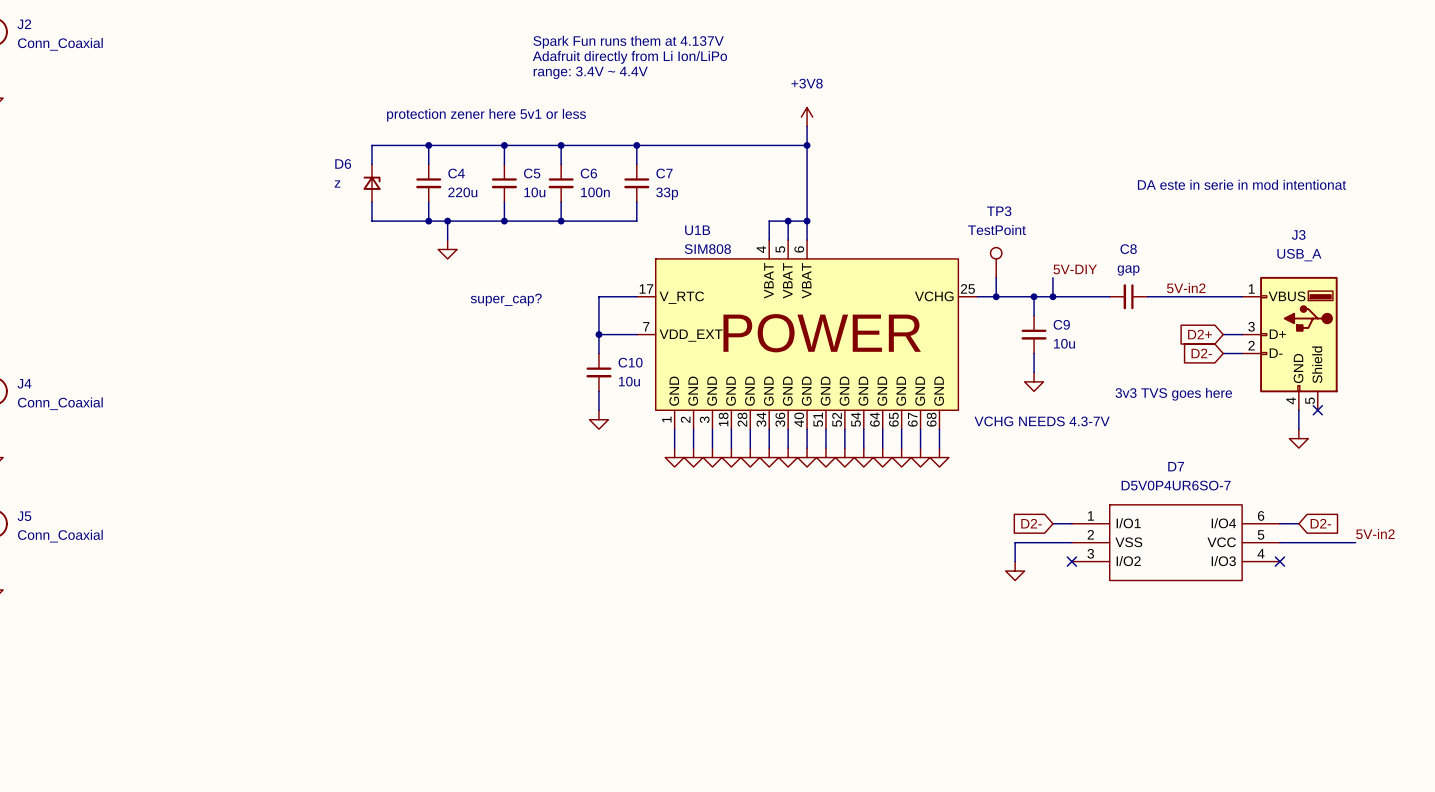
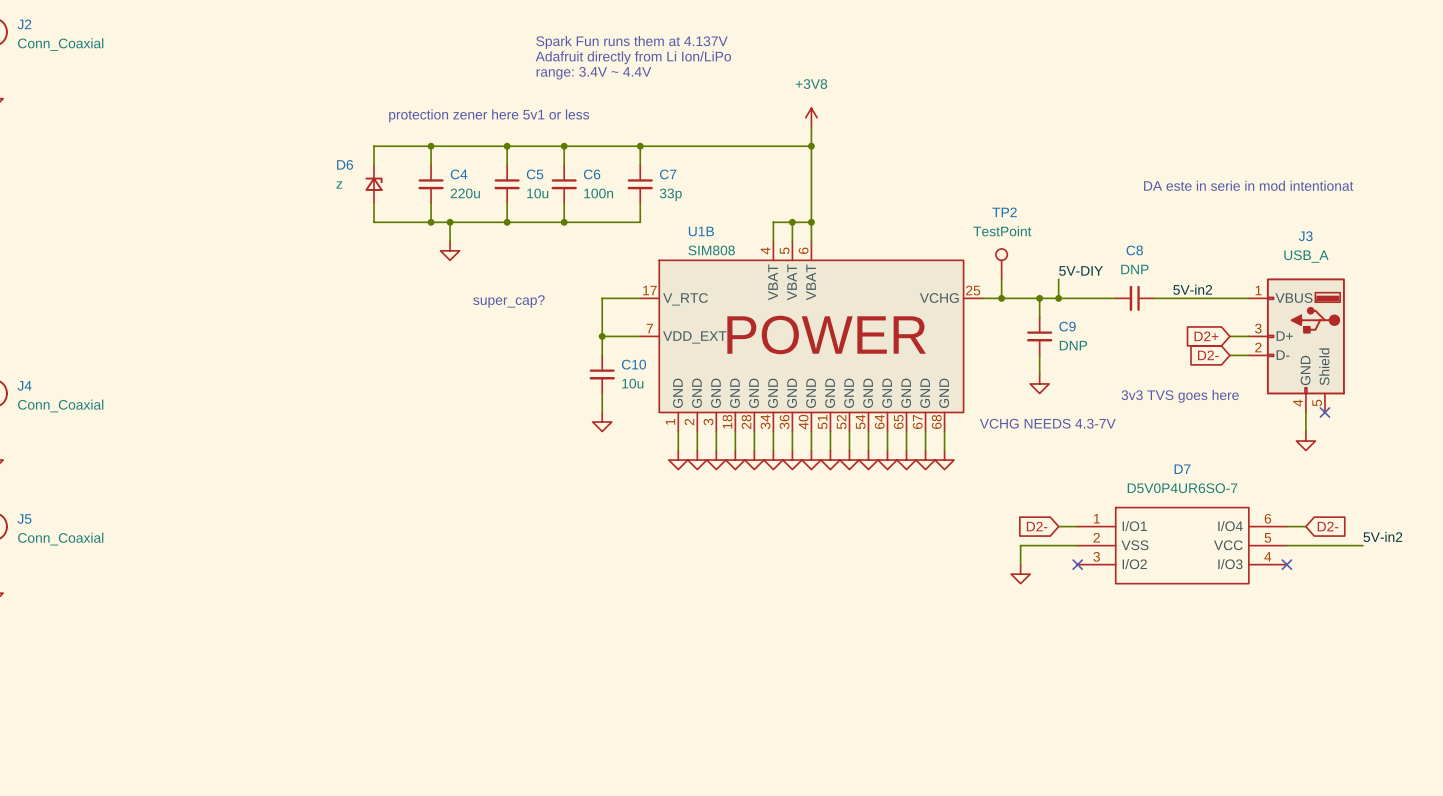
TP3 name: TP3 (999, 211) -> TP2 (1004, 212)
C8 value: gap (1128, 270) -> DNP (1134, 269)
C9 value: 10u (1064, 343) -> DNP (1073, 345)

